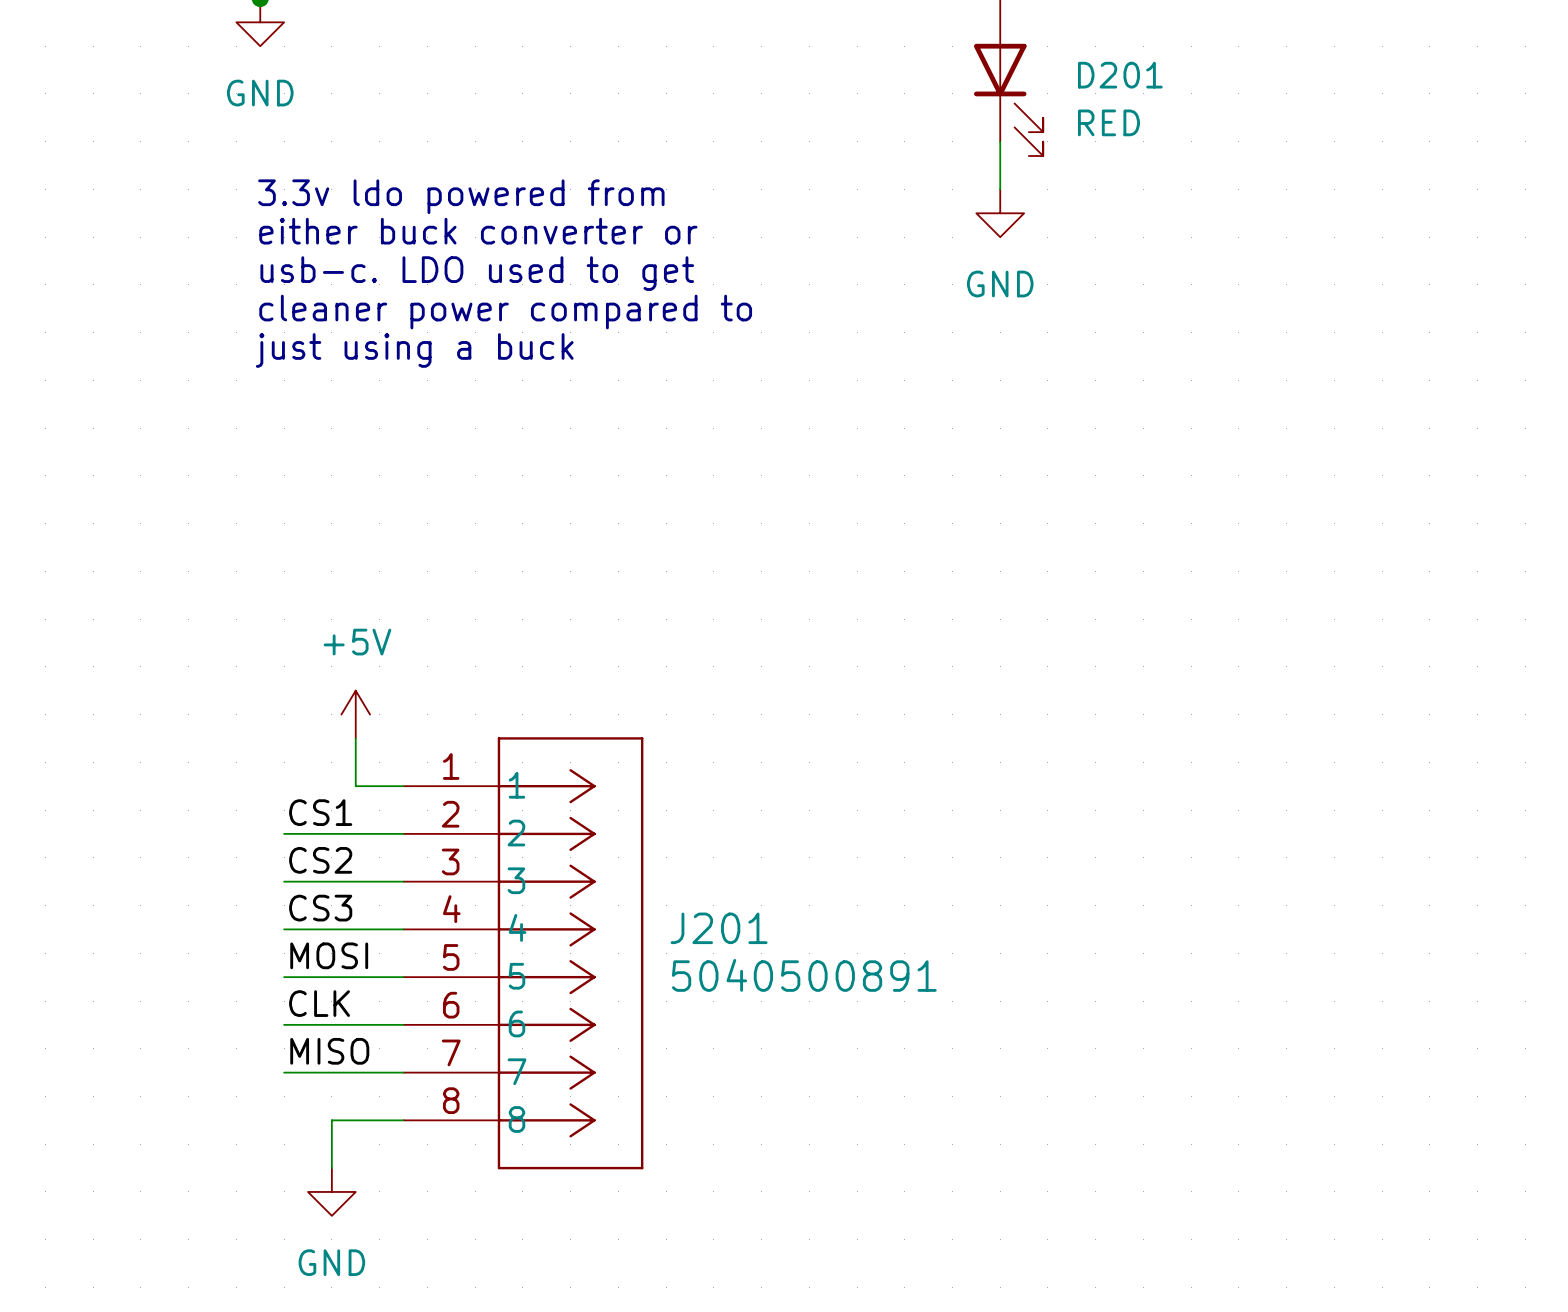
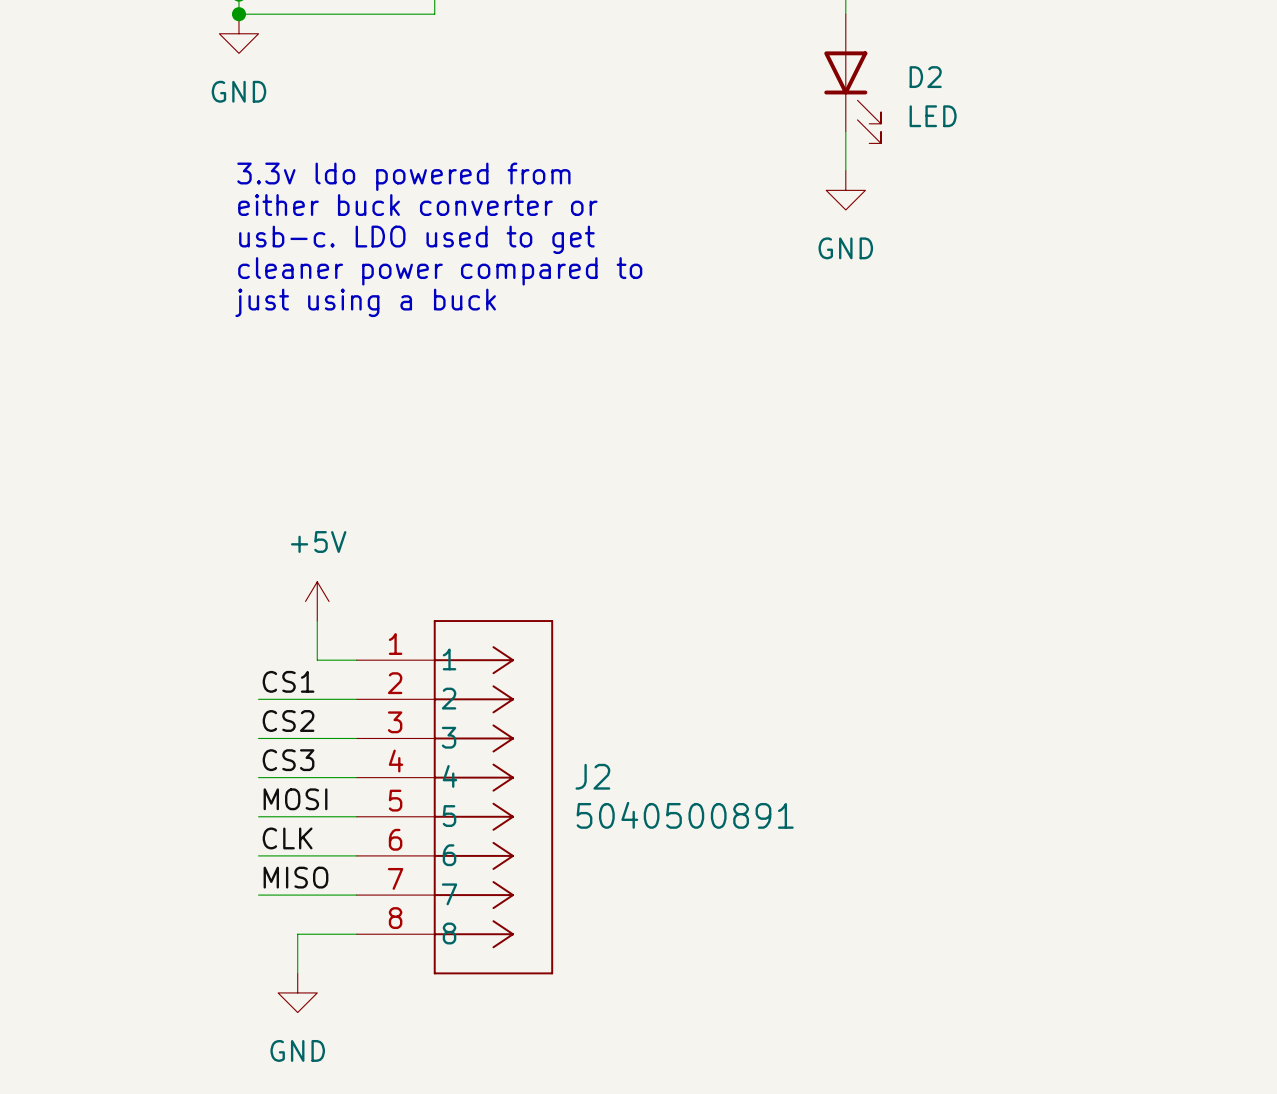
D201 name: D201 (1120, 75) -> D2 (925, 77)
D201 value: RED (1108, 122) -> LED (933, 116)
J201 name: J201 (719, 928) -> J2 (592, 776)

